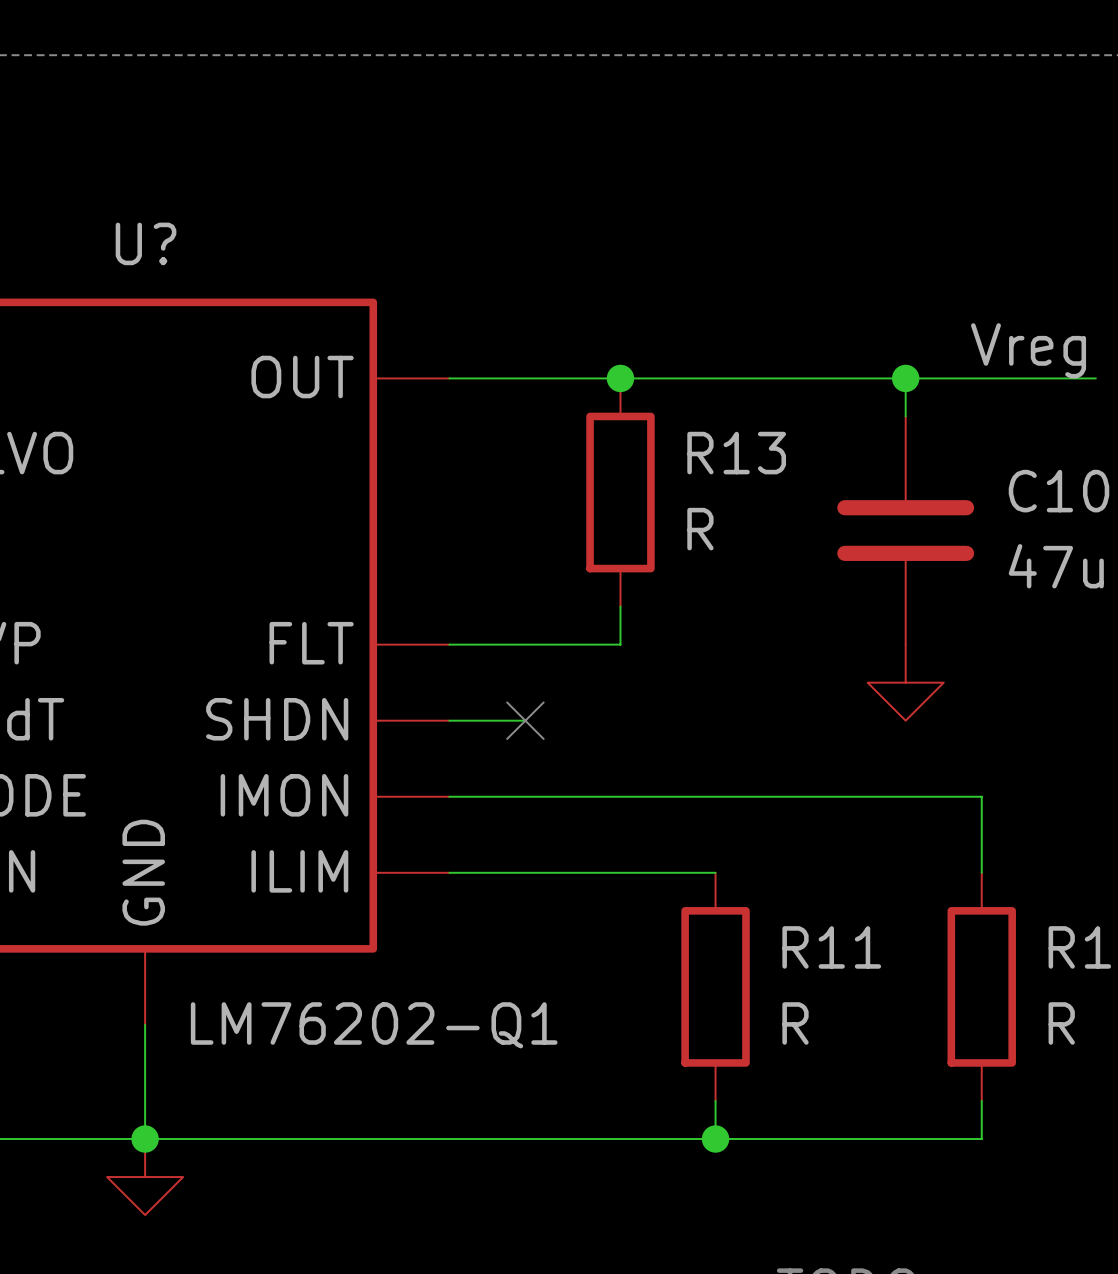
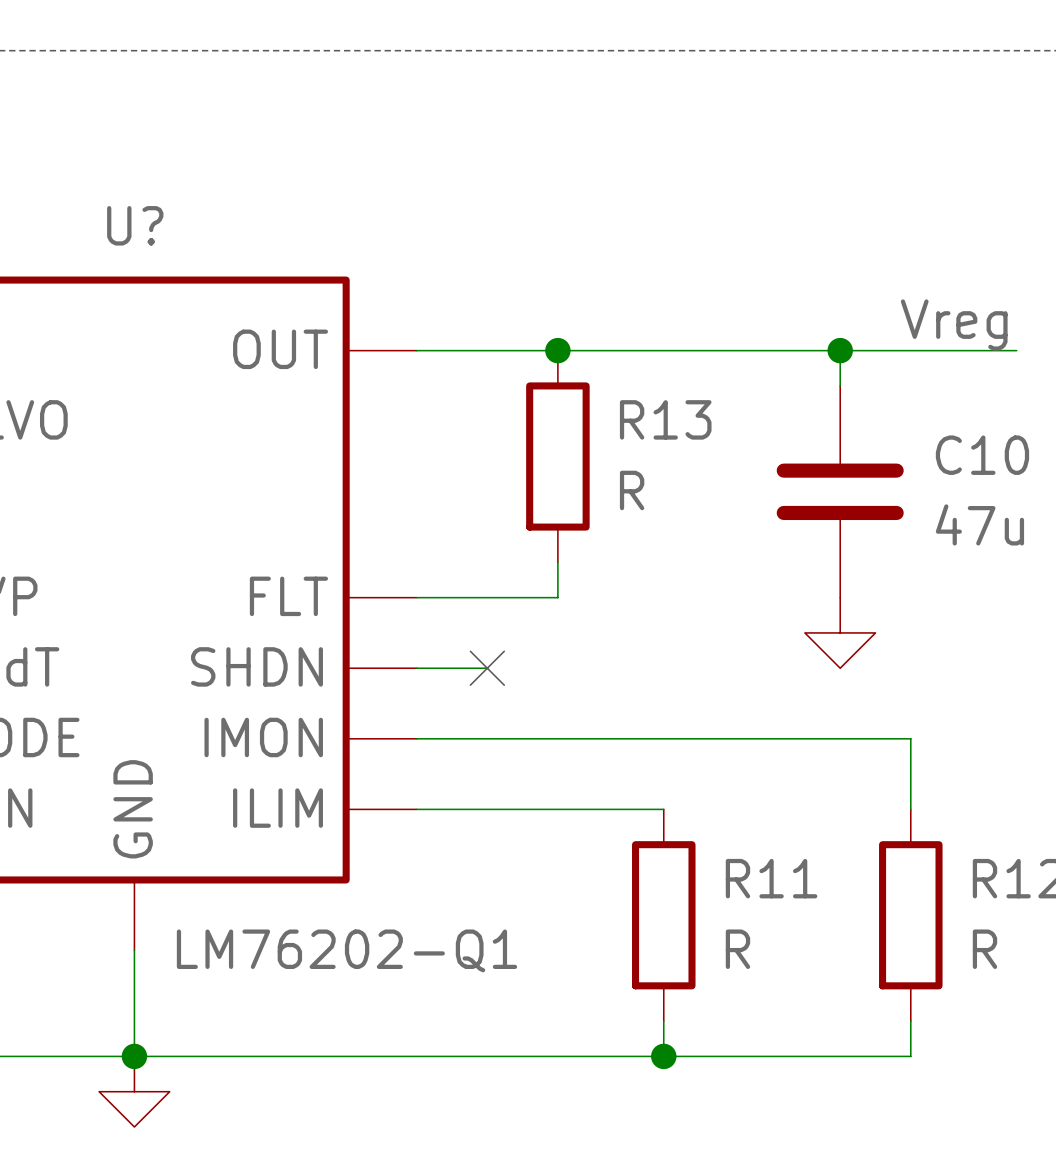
junction position: (620, 378) -> (557, 350)
R13 position: (620, 492) -> (557, 456)
wire: (620, 606) (620, 644) (601, 644) -> (557, 562) (557, 597)

